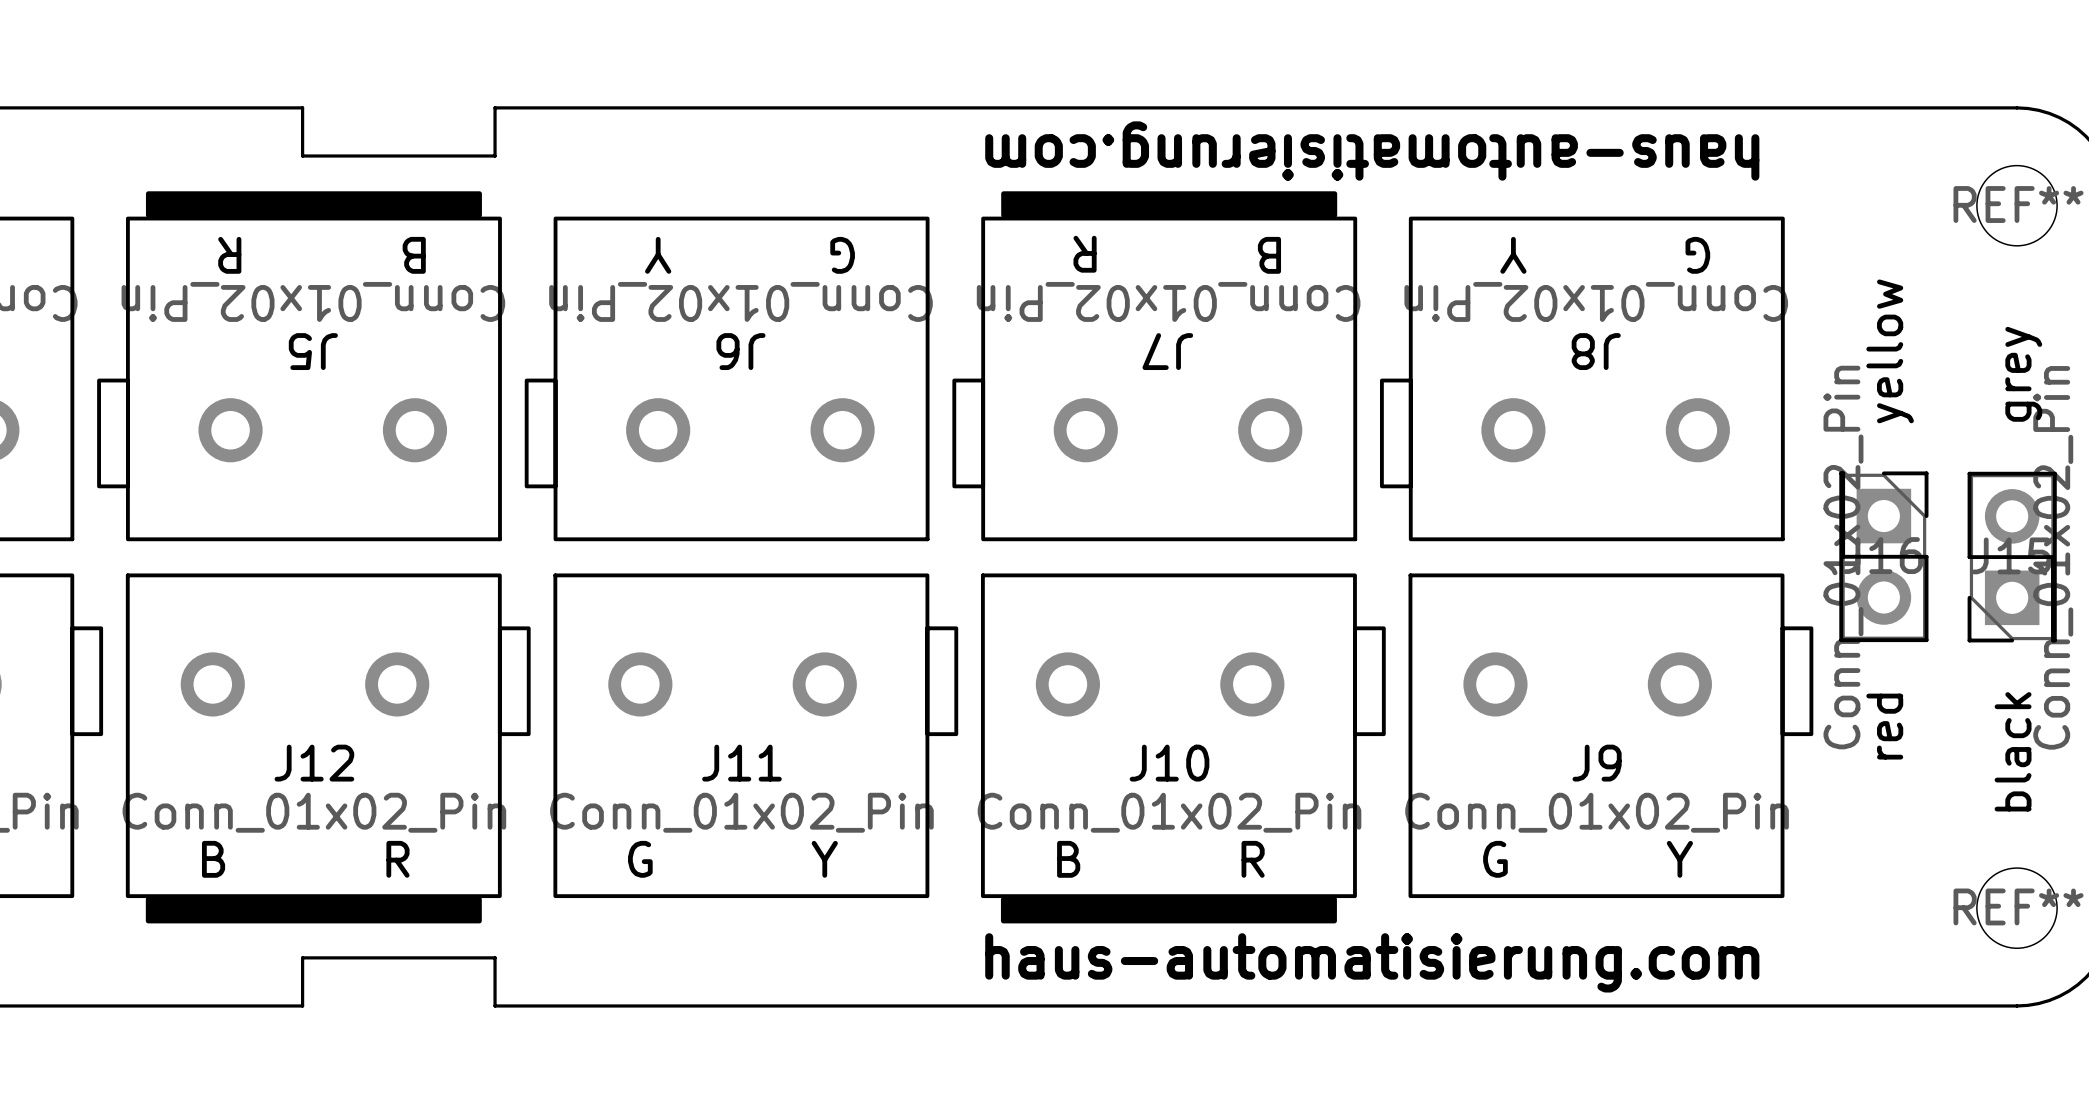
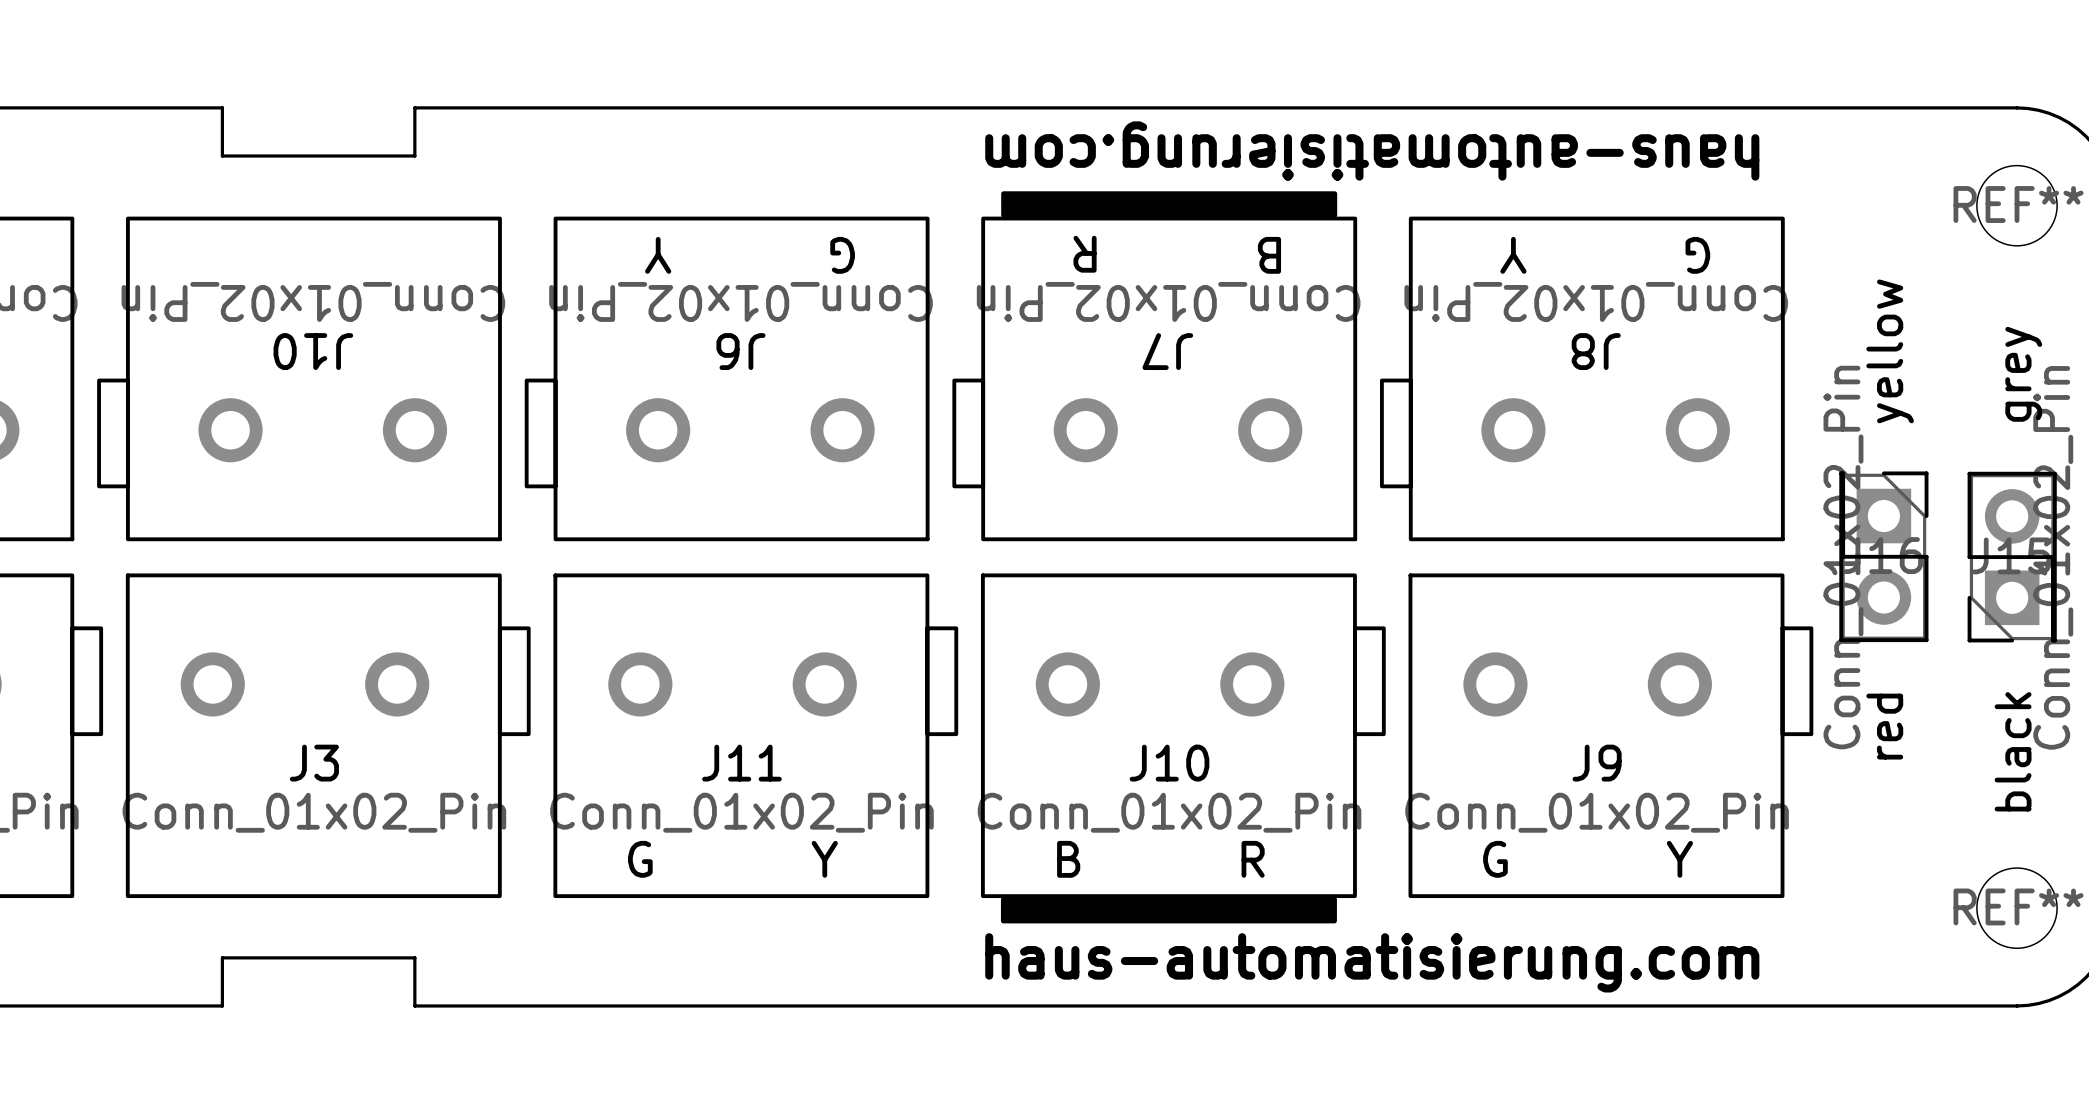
board edge: (222, 107) (302, 107) (302, 156) -> (222, 107) (222, 156) (302, 156)
board edge: (495, 107) (495, 156) (414, 156) -> (495, 107) (414, 107) (414, 156)
drawing: [145, 191, 482, 218] -> none
text: R (229, 255) -> none
text: B (414, 255) -> none
J5 name: J5 (313, 351) -> J10 (313, 351)
J12 name: J12 (314, 763) -> J3 (314, 763)
text: B (213, 859) -> none
text: R (397, 859) -> none
drawing: [145, 896, 482, 924] -> none
board edge: (302, 957) (302, 1005) (222, 1005) -> (302, 957) (222, 957) (222, 1005)
board edge: (414, 957) (495, 957) (495, 1005) -> (414, 957) (414, 1005) (495, 1005)

